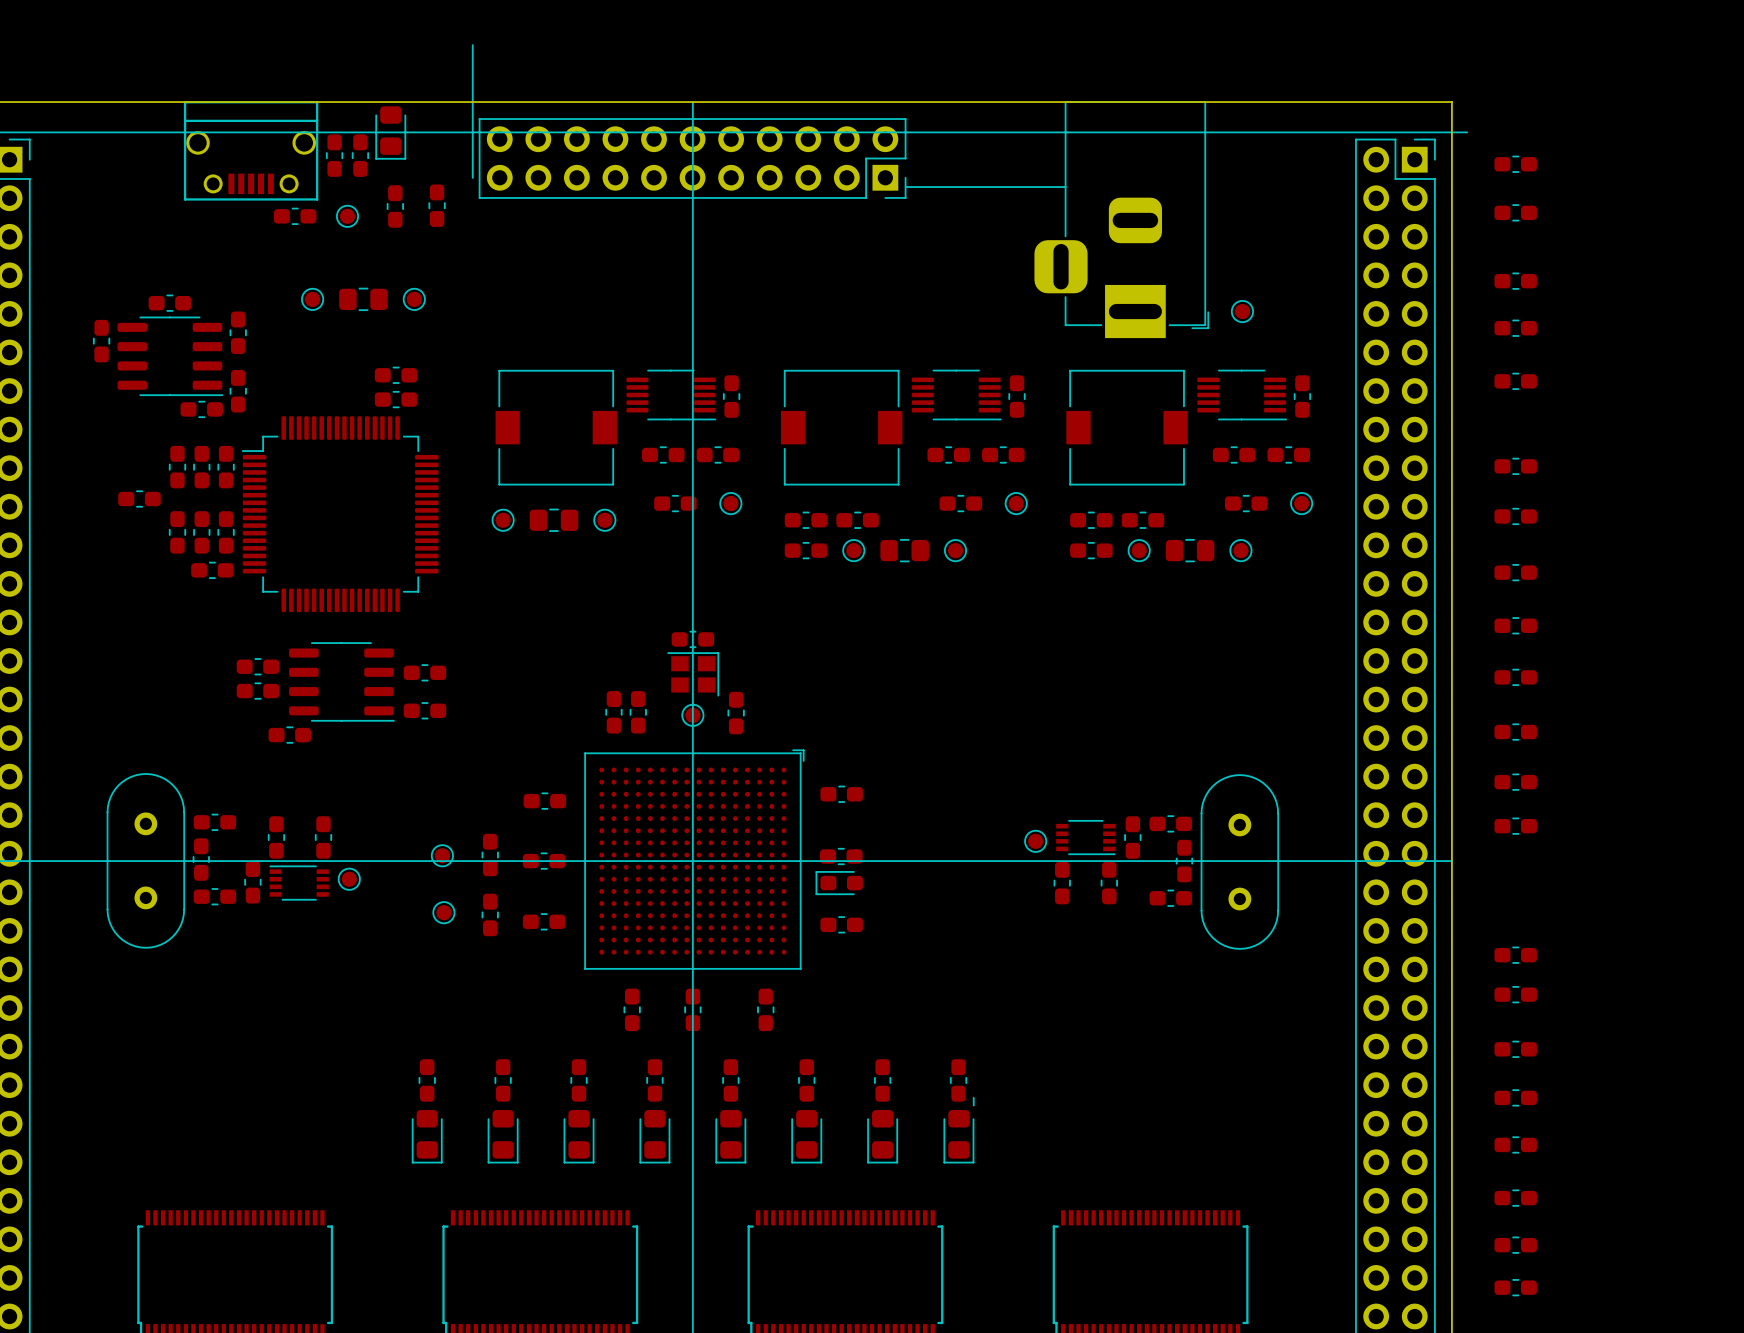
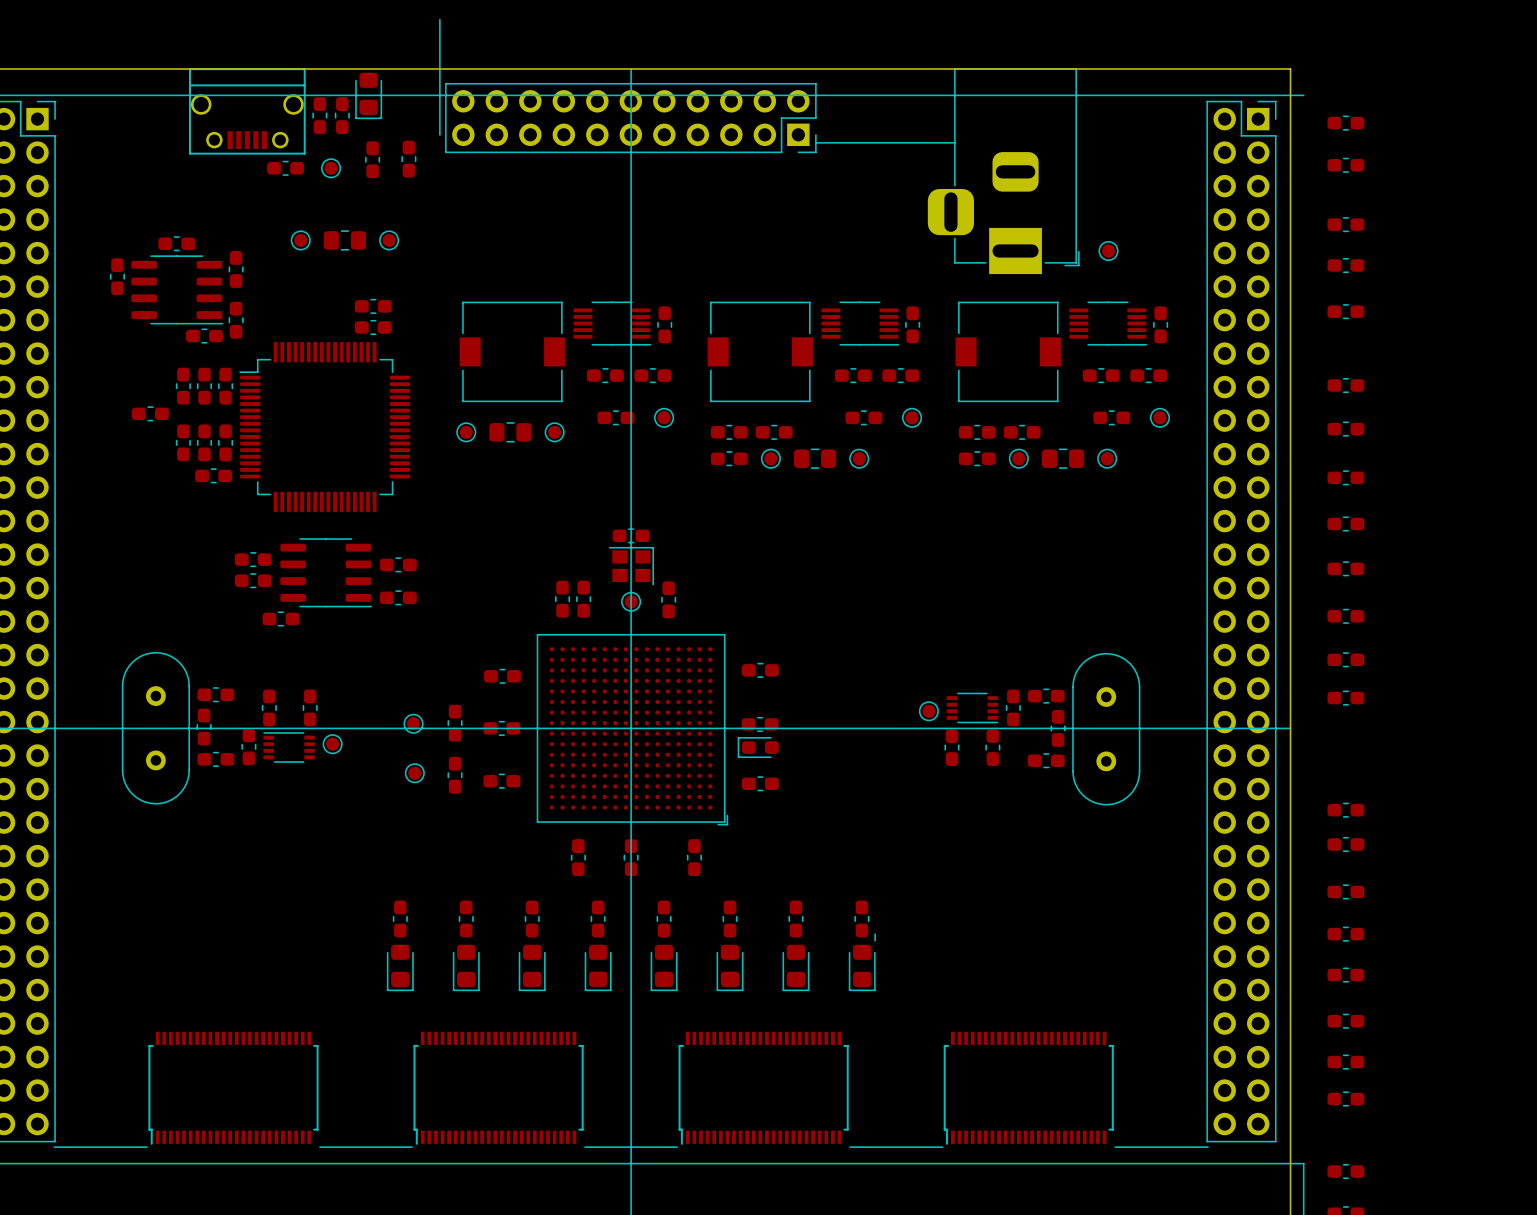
part rotation: 0° (694, 859) -> 90° clockwise (632, 729)

